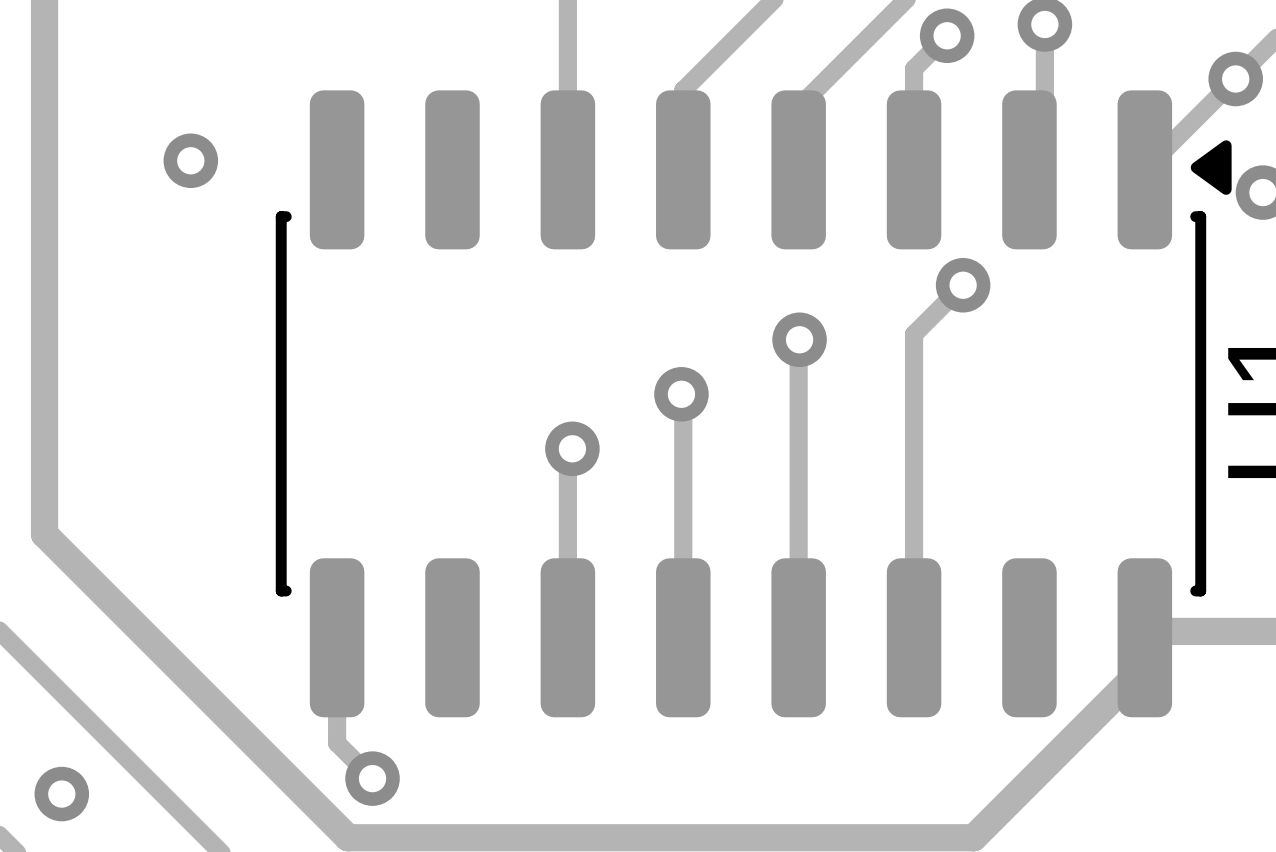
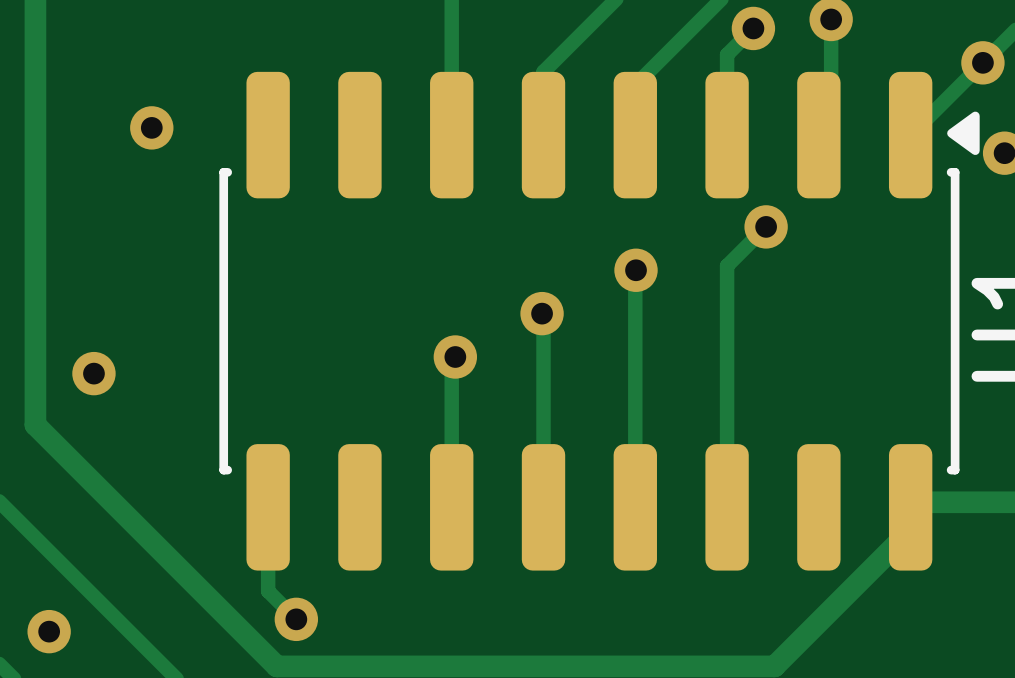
via: none -> (93, 373)

